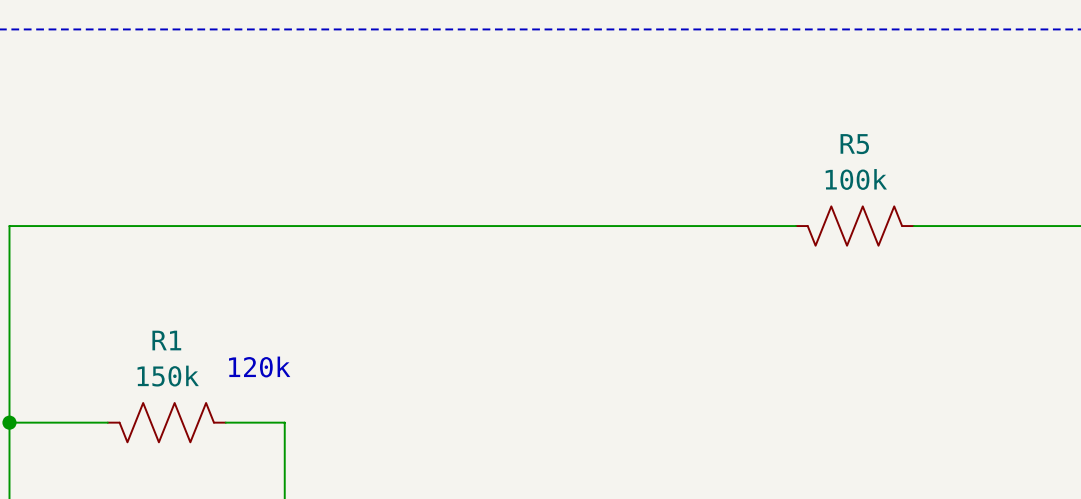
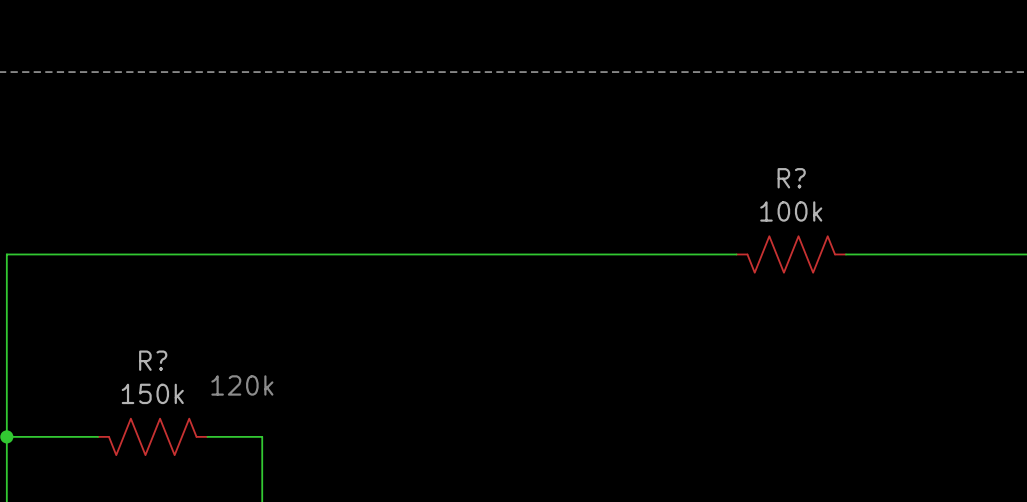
R5 name: R5 (854, 144) -> R? (791, 178)
R1 name: R1 (166, 340) -> R? (153, 360)

